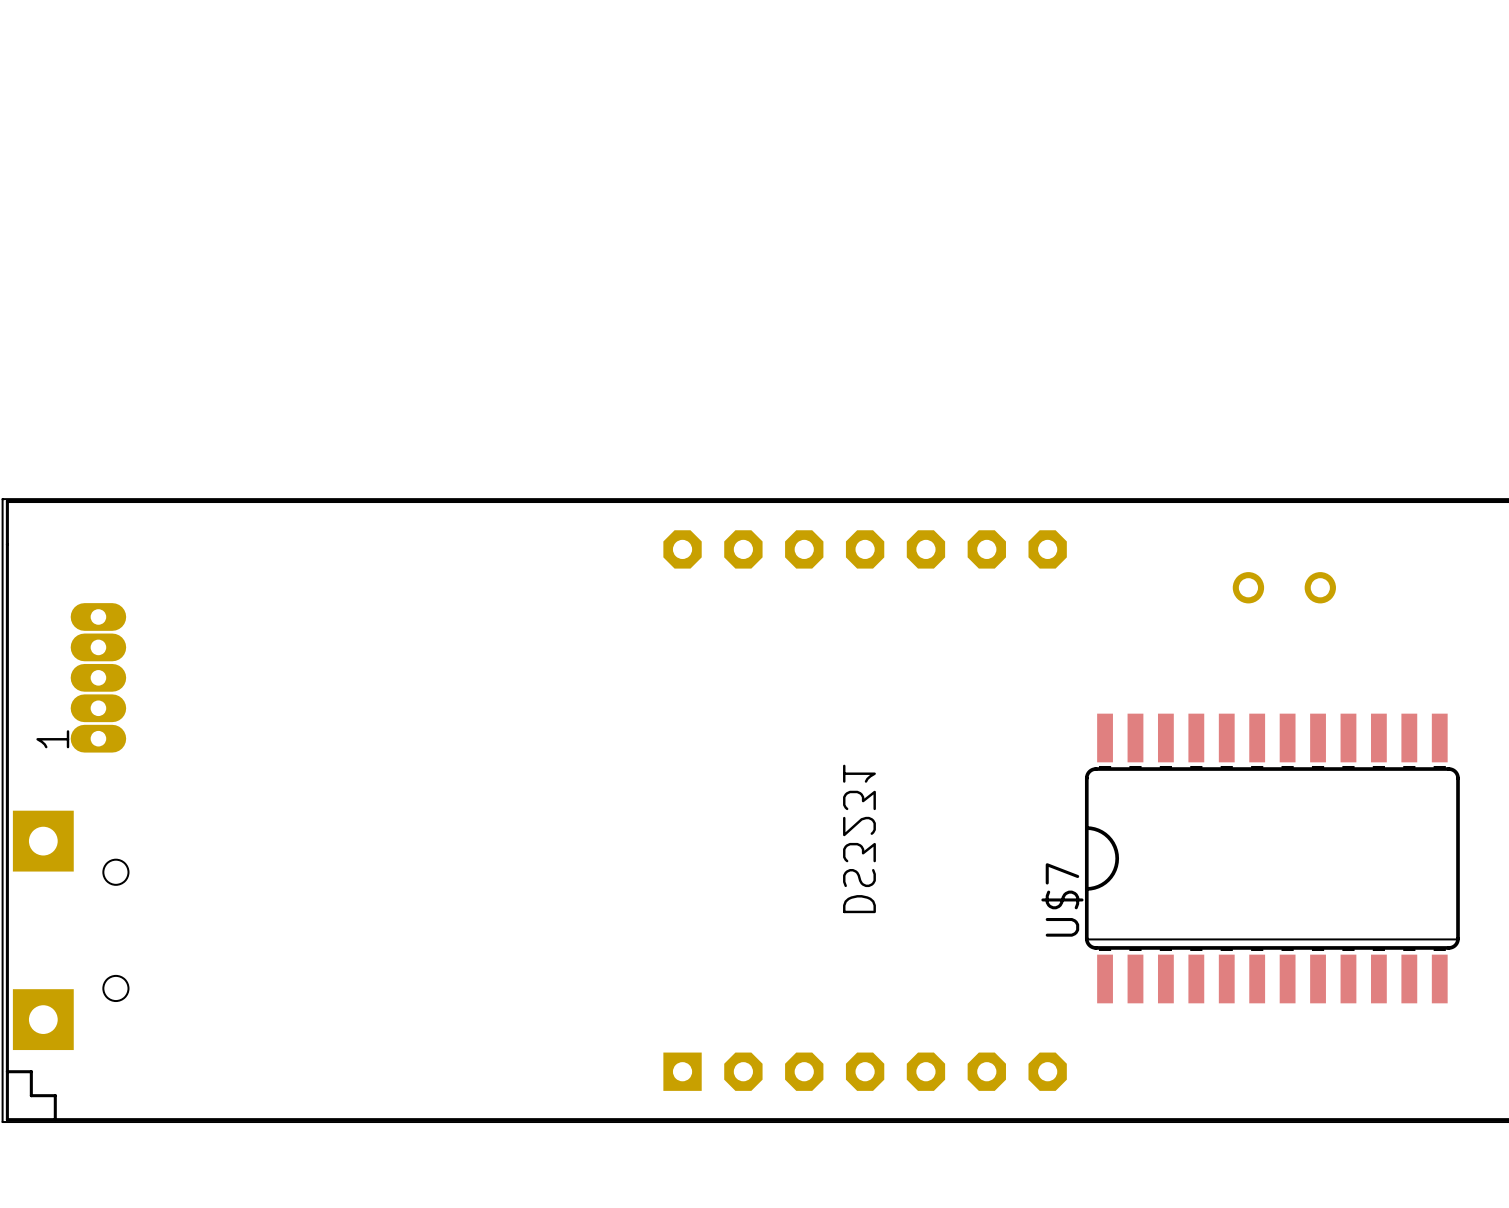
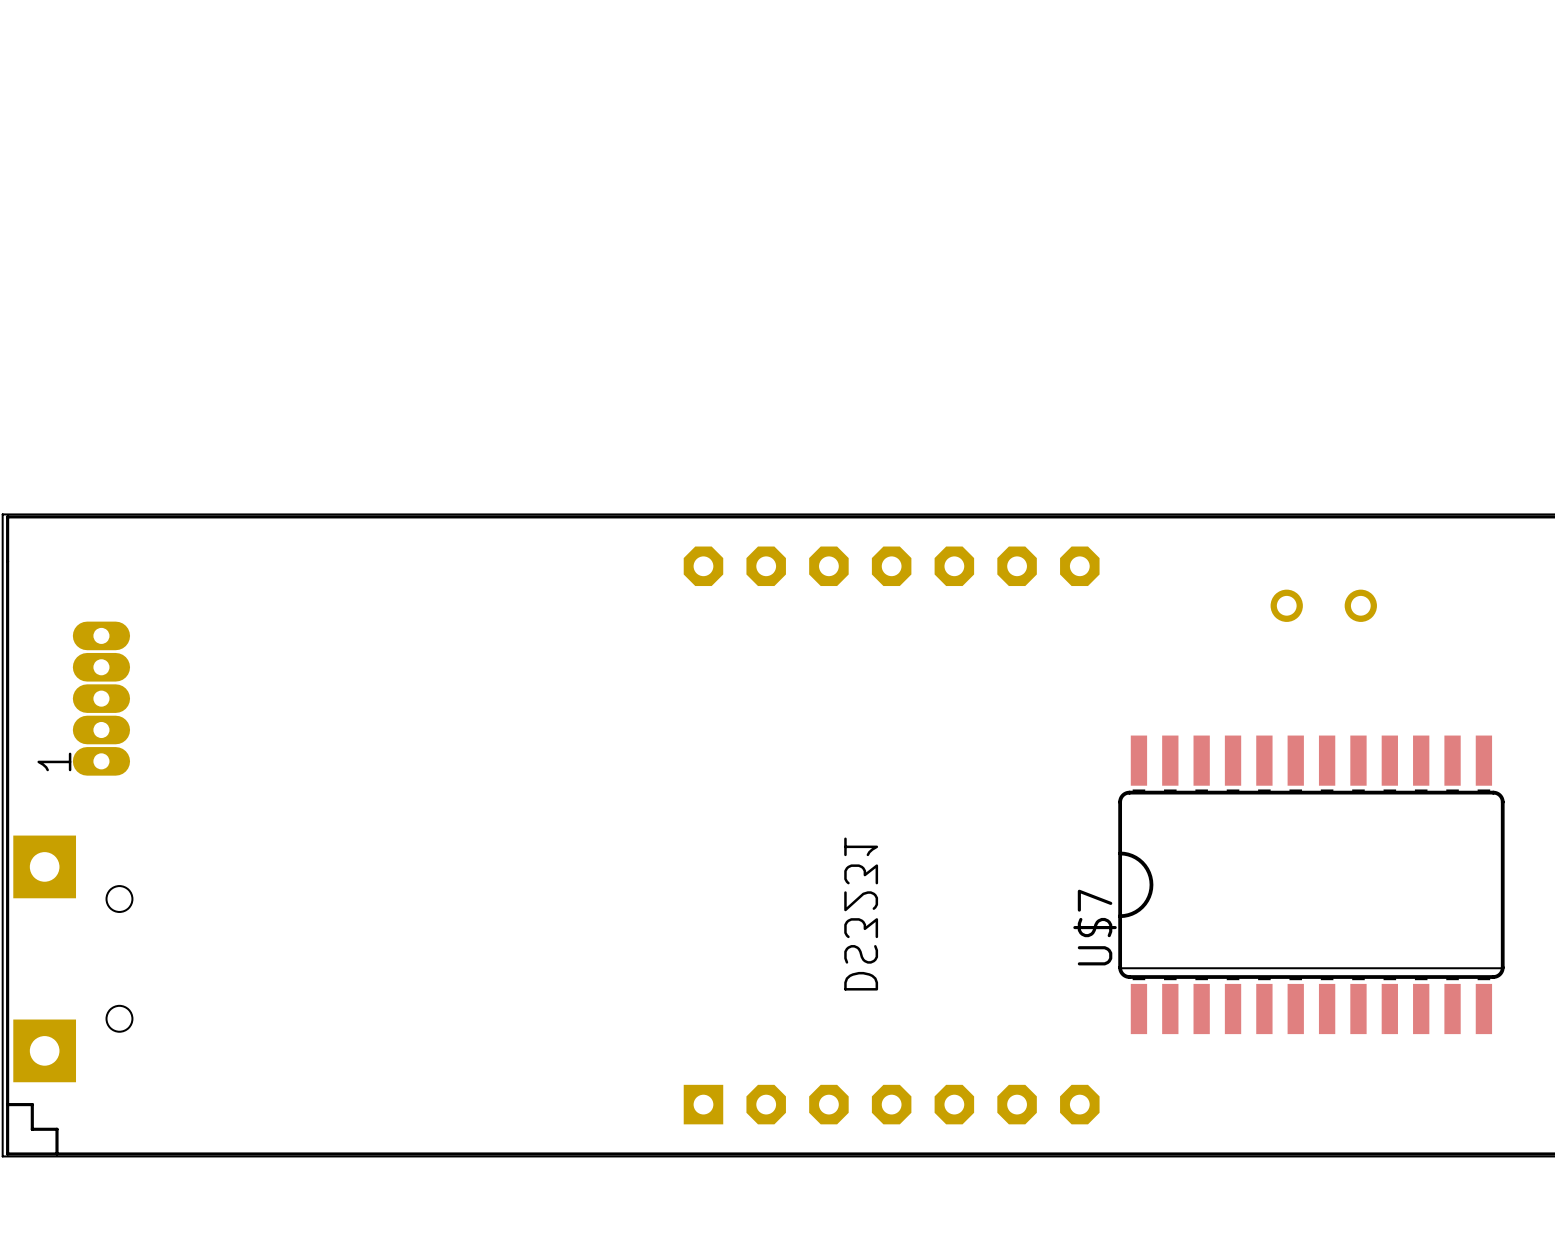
part position: (859, 838) -> (861, 914)

